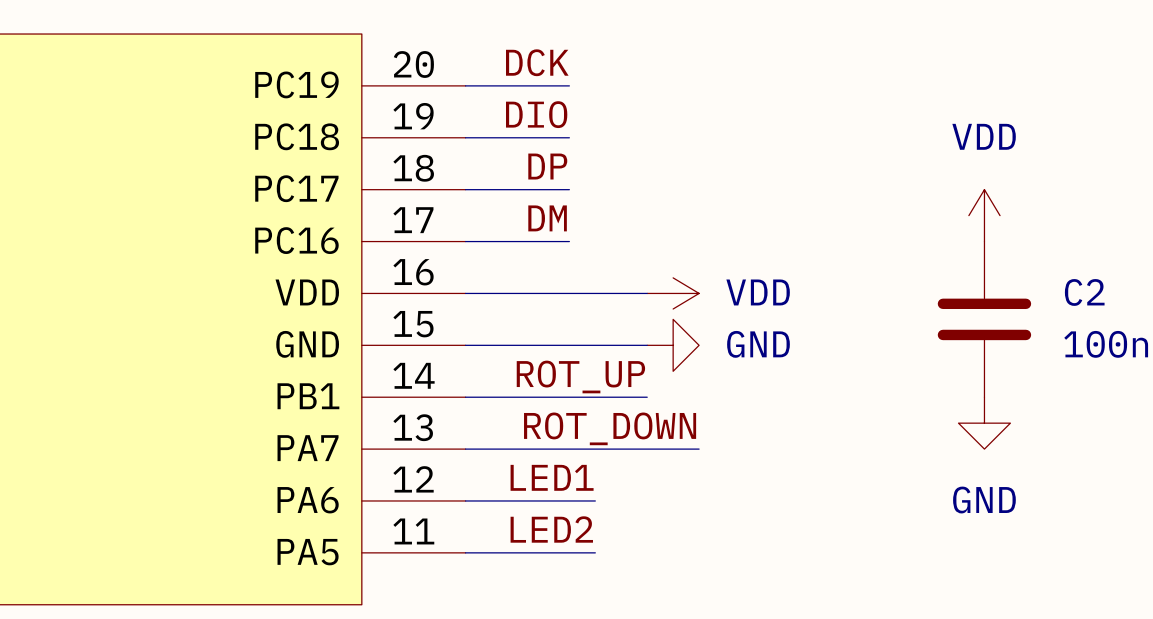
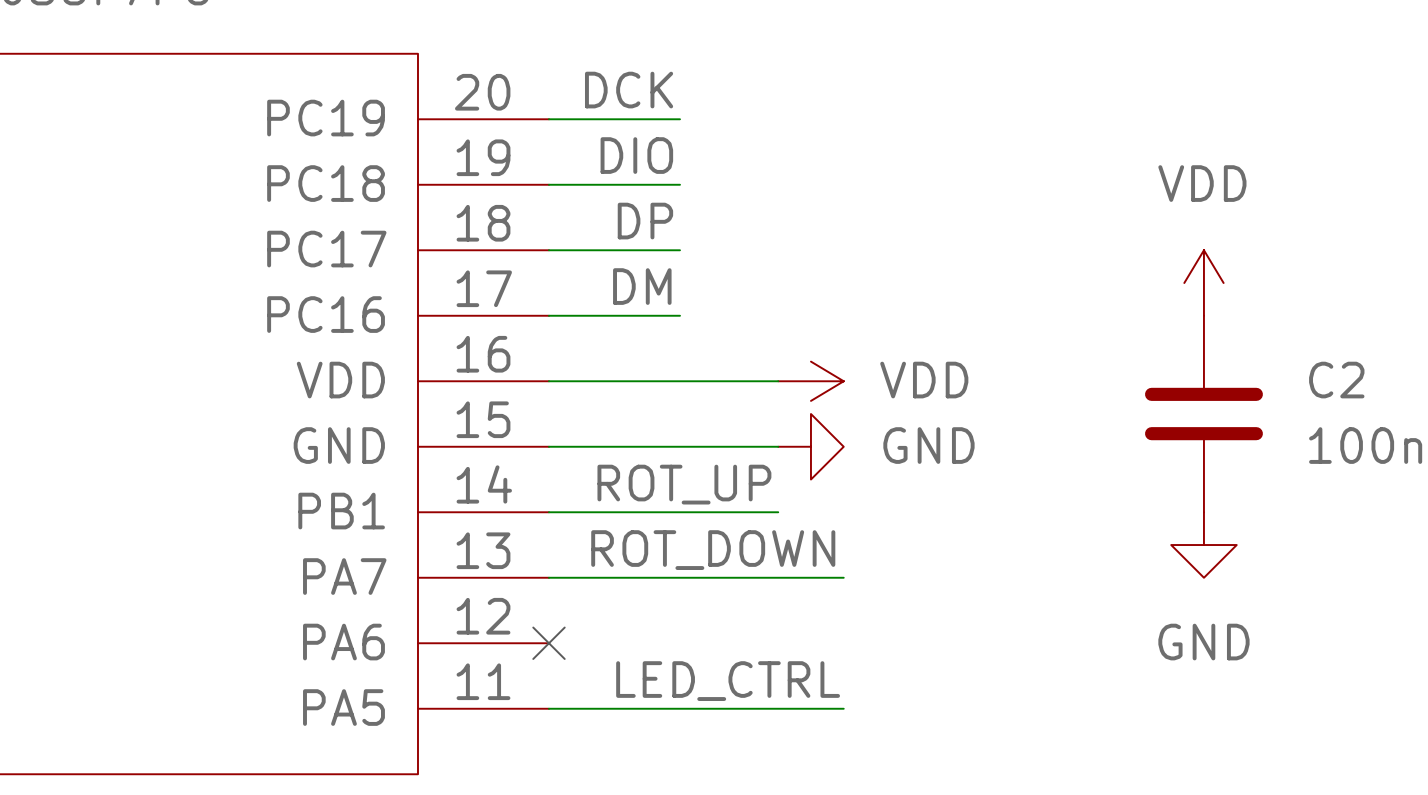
label: LED1 (552, 477) -> none
wire: (465, 500) (595, 500) -> none
no-connect mark: none -> (548, 643)
label: LED2 (551, 529) -> none
label: none -> LED_CTRL (728, 681)
wire: none -> (712, 708) (843, 708)

